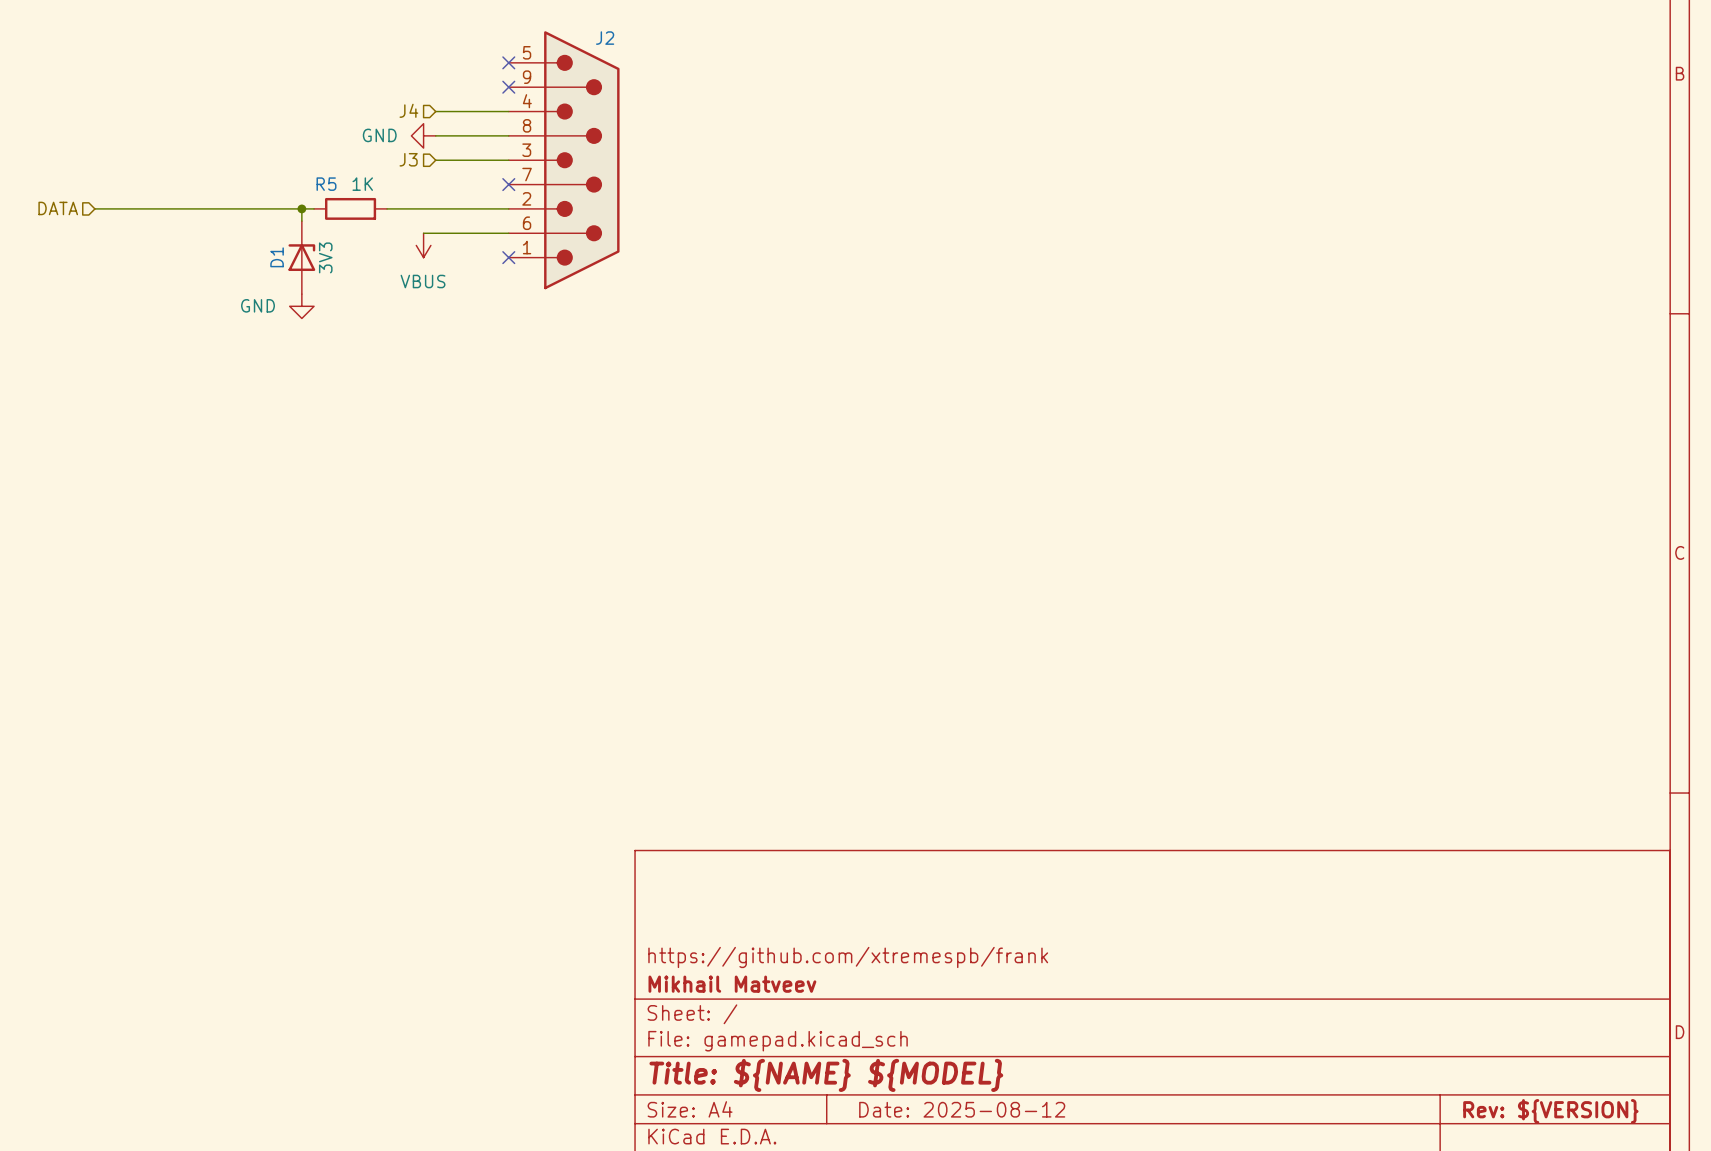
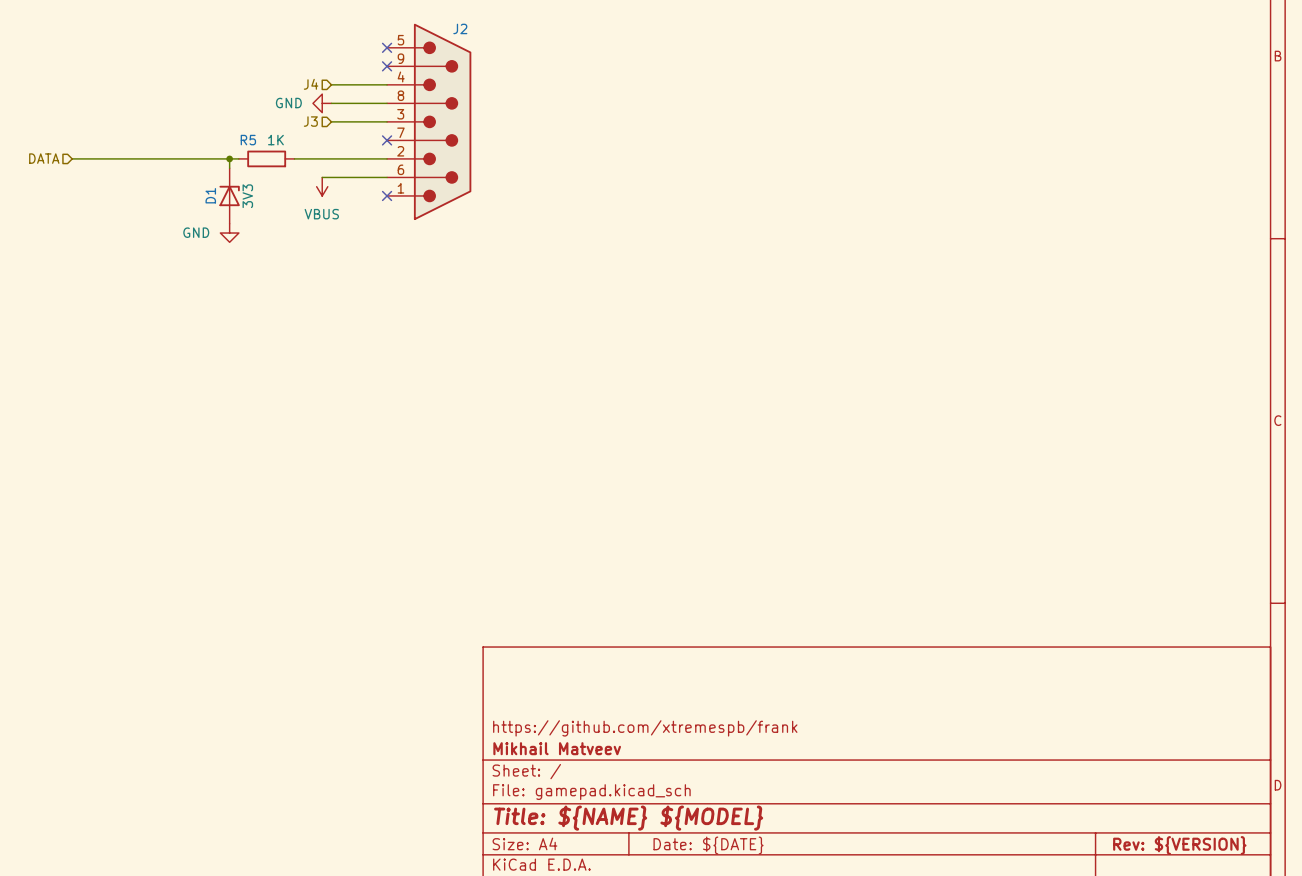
title block: Date: 2025-08-12 (962, 1109) -> Date: ${DATE} (708, 845)

